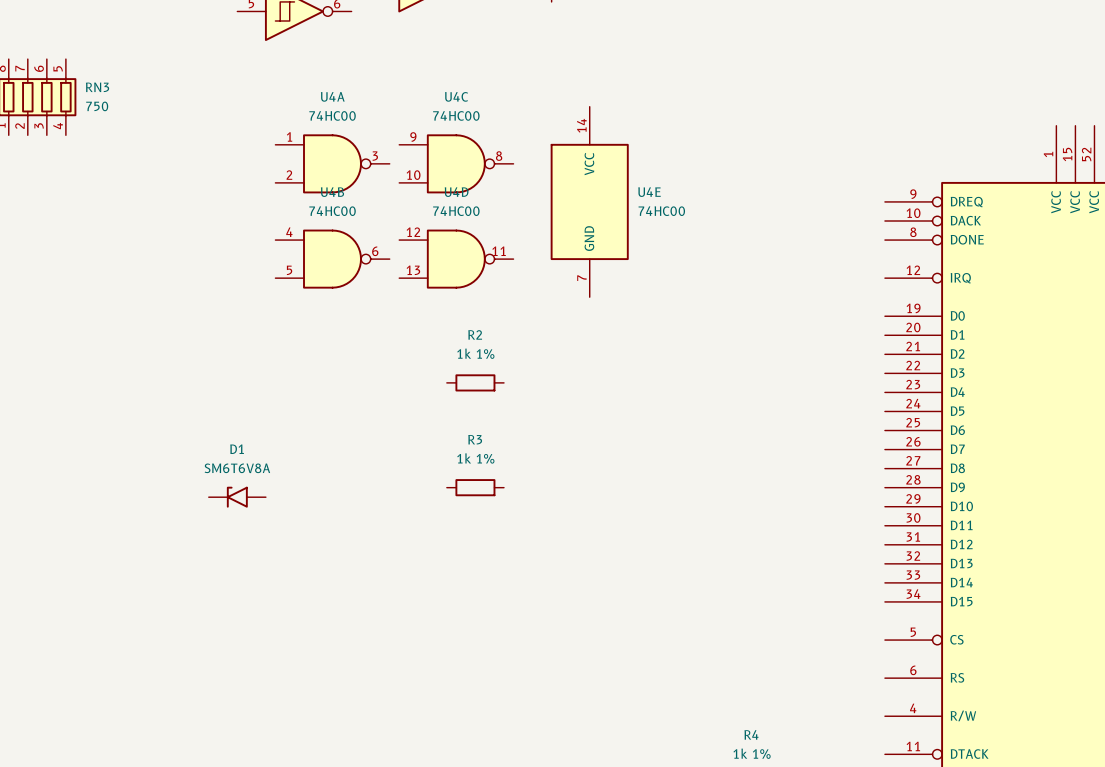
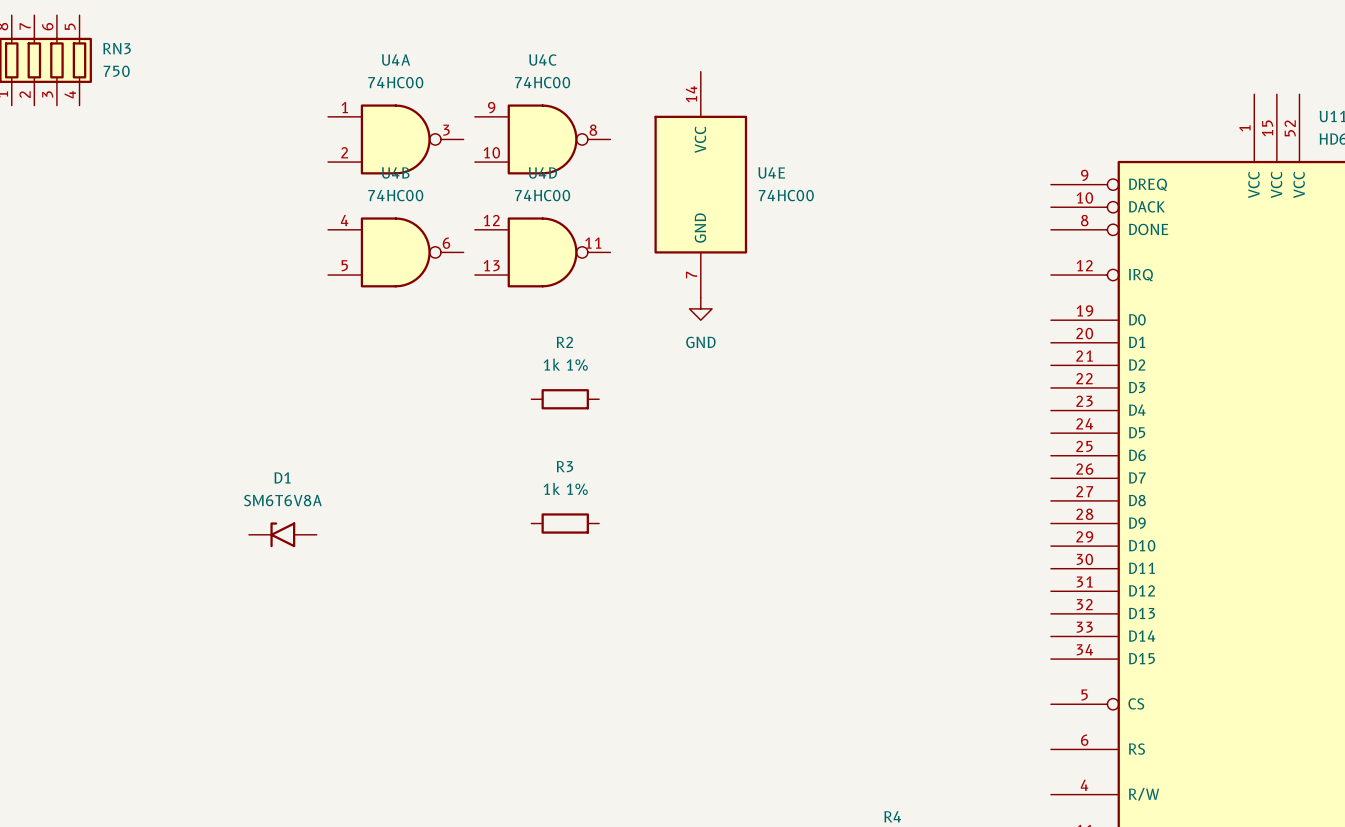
power symbol: none -> GND (700, 308)

